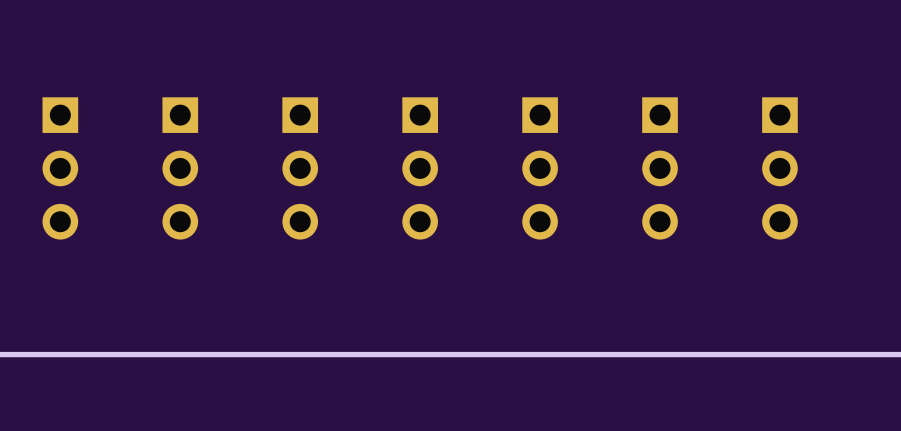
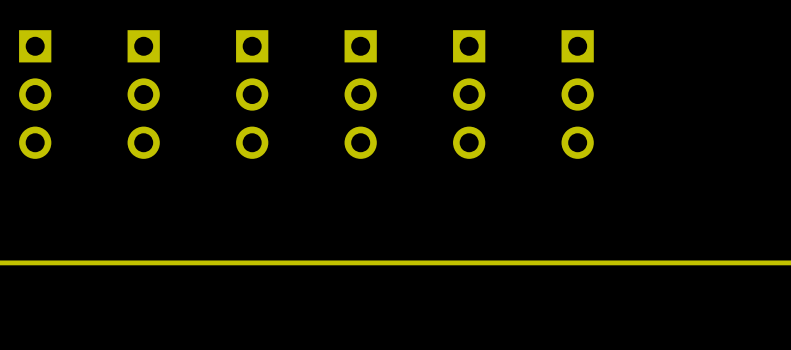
part: (779, 168) -> none

